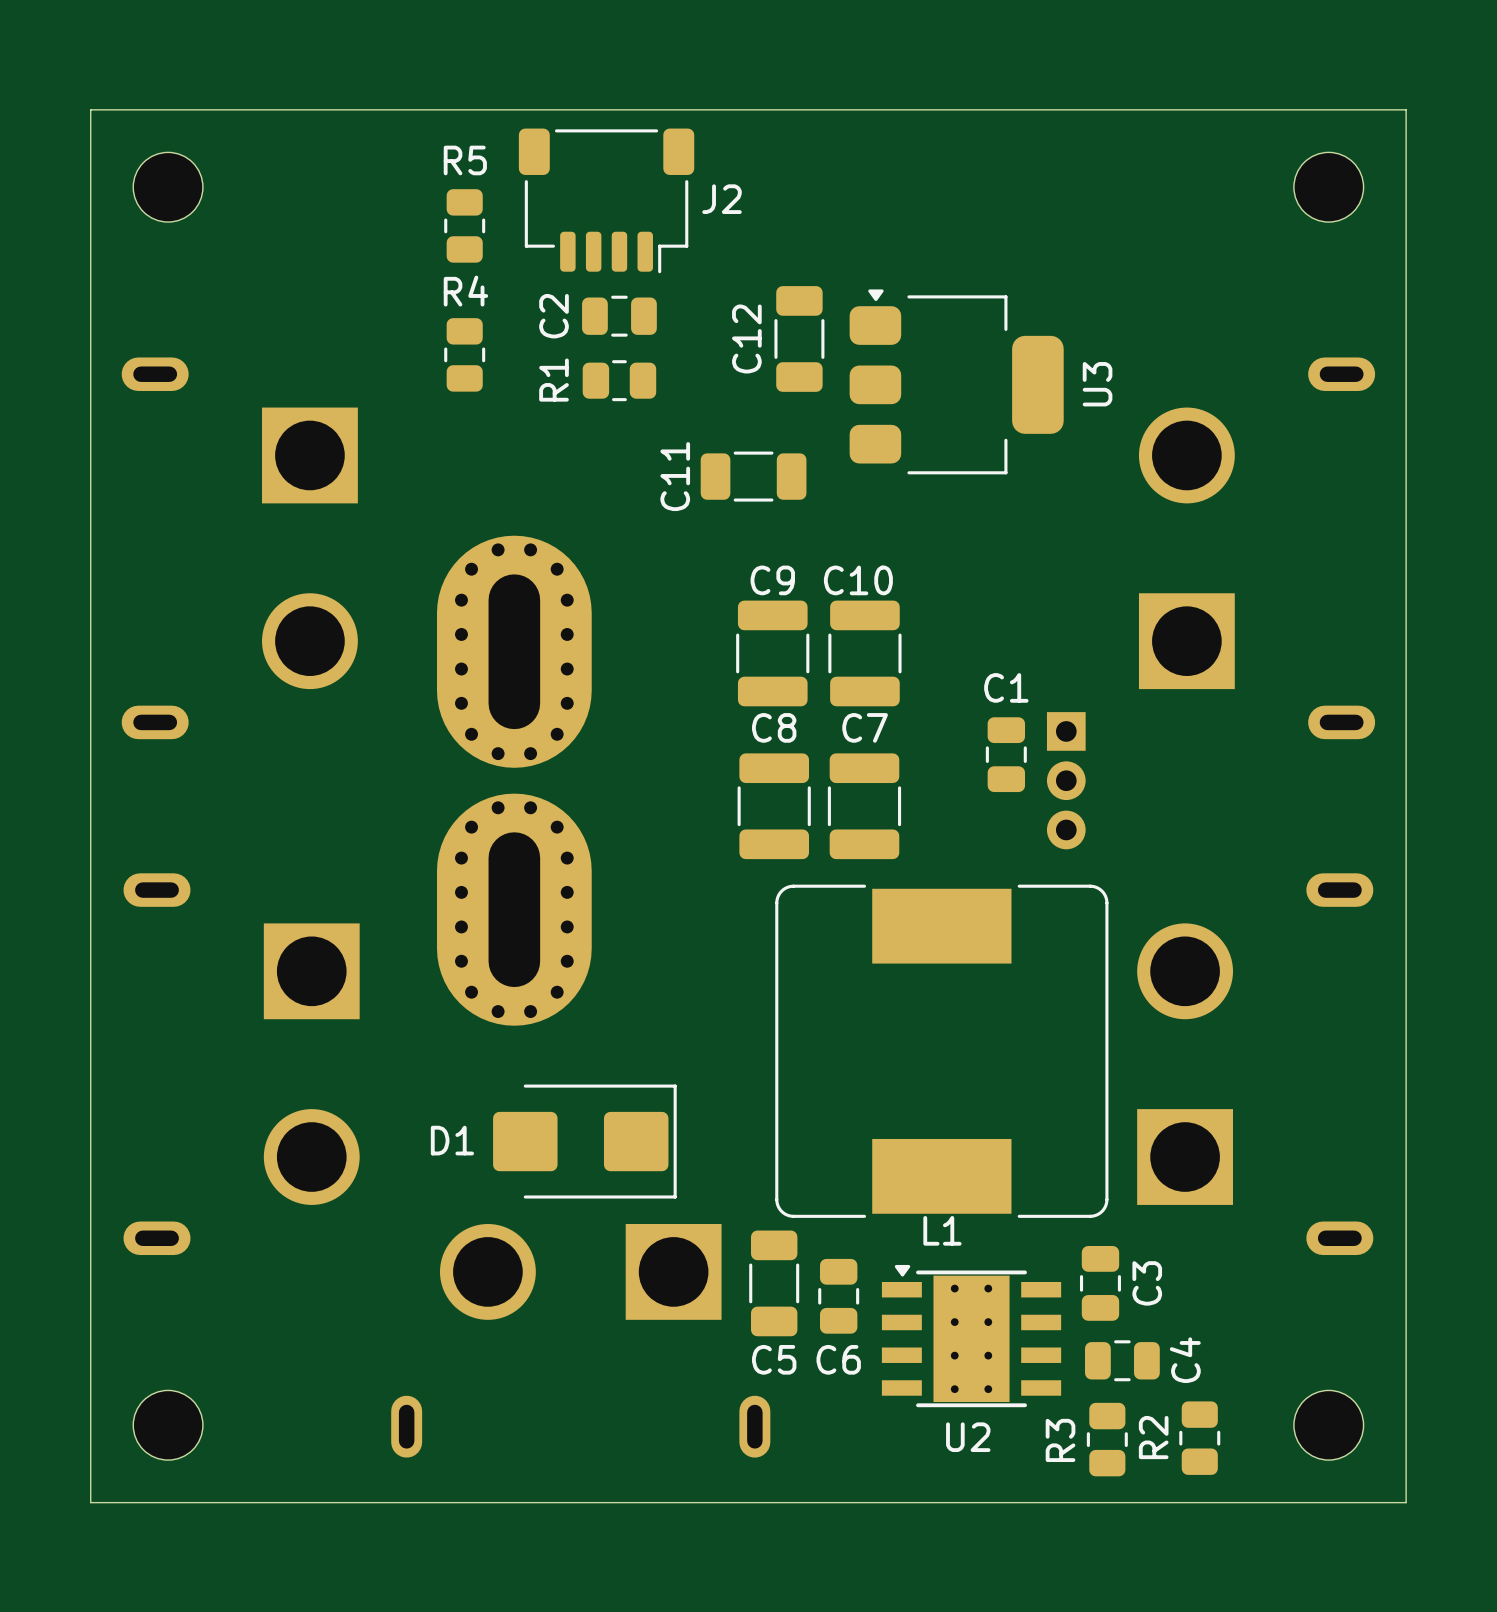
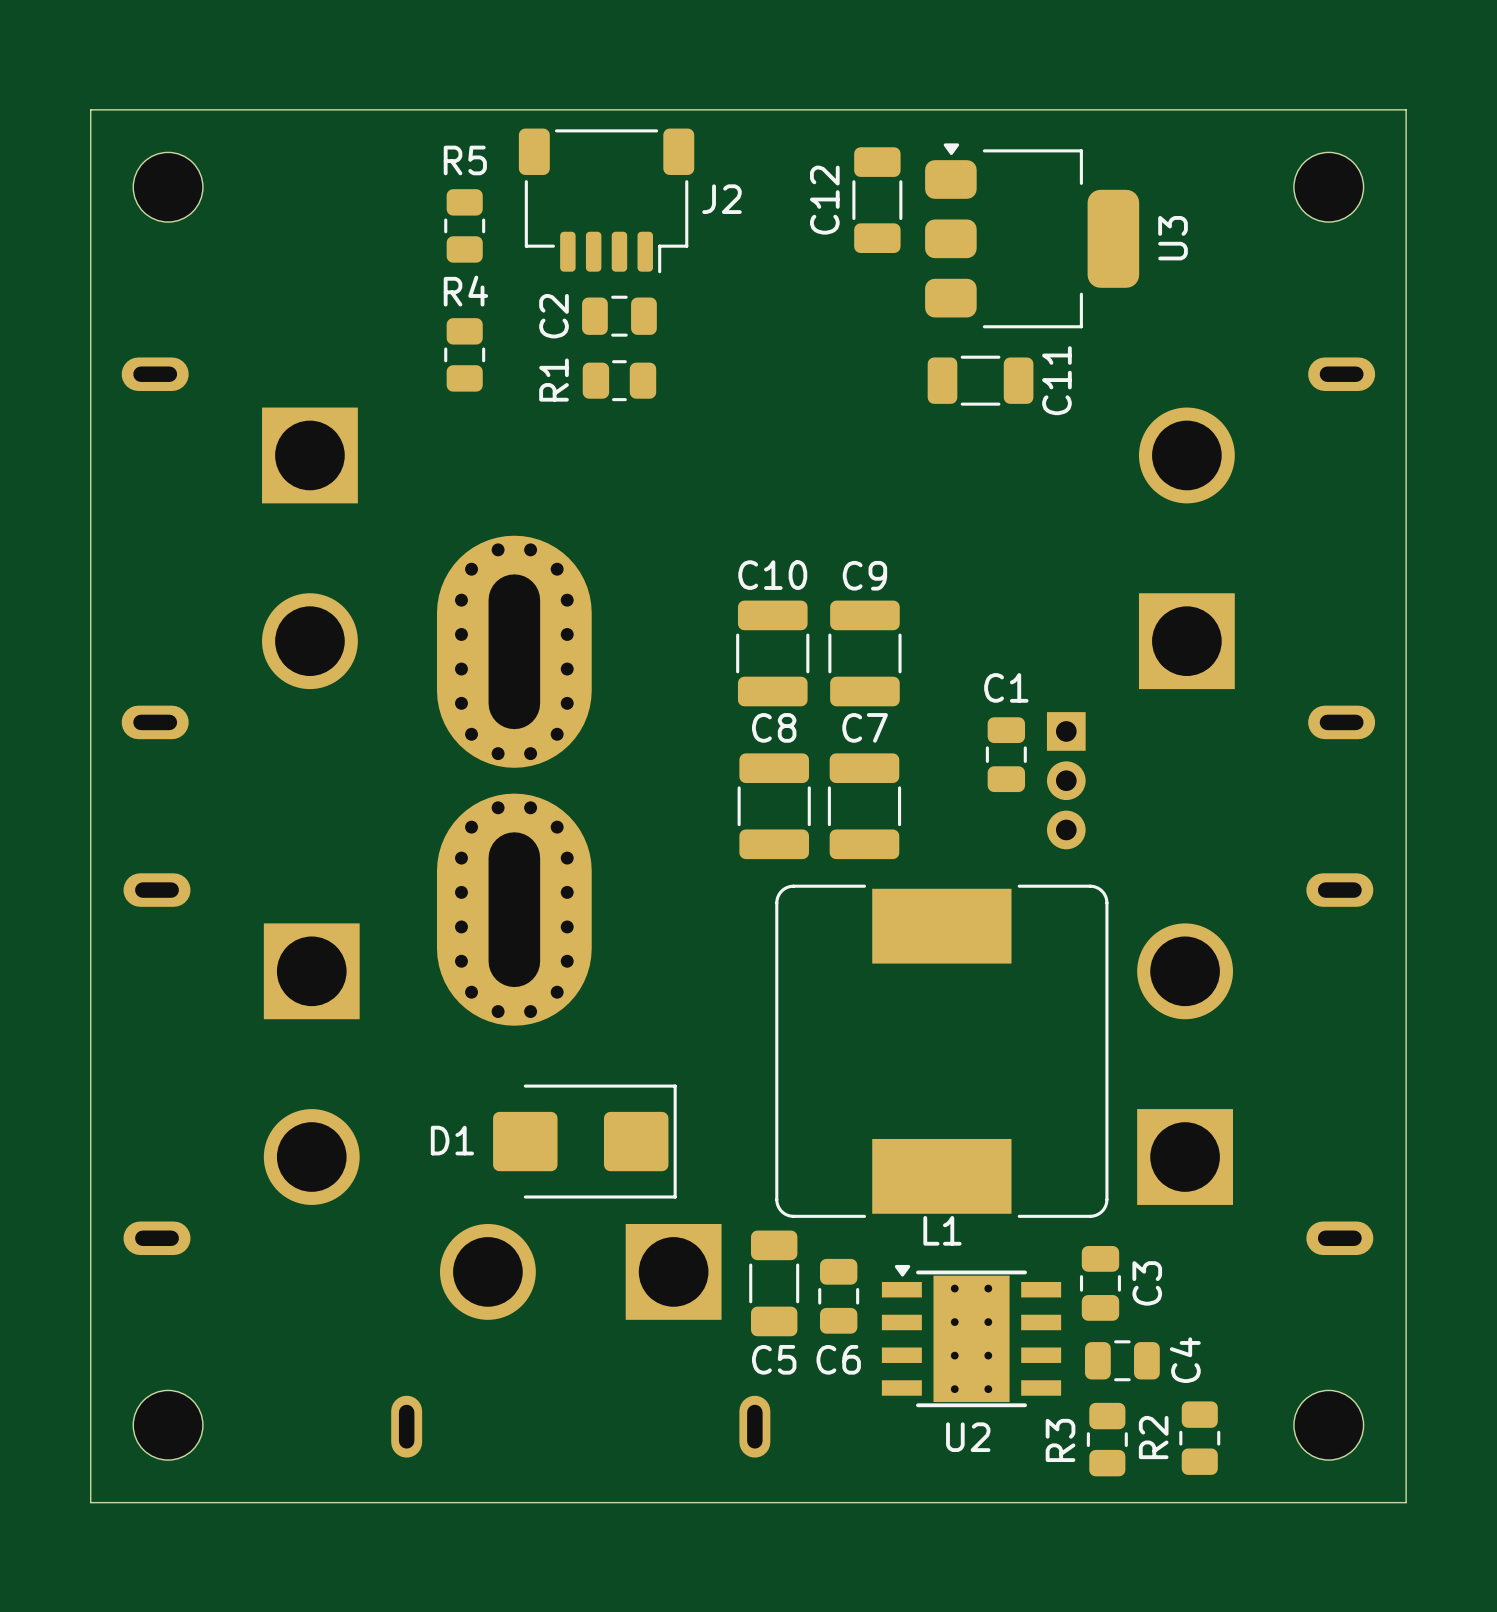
C12 position: (799, 338) -> (877, 200)
U3 position: (956, 381) -> (1032, 235)
C11 name position: C11 (675, 476) -> C11 (1056, 380)
C11 position: (753, 476) -> (980, 380)
C9 name: C9 (772, 580) -> C10 (772, 575)
C10 name: C10 (858, 580) -> C9 (864, 575)

